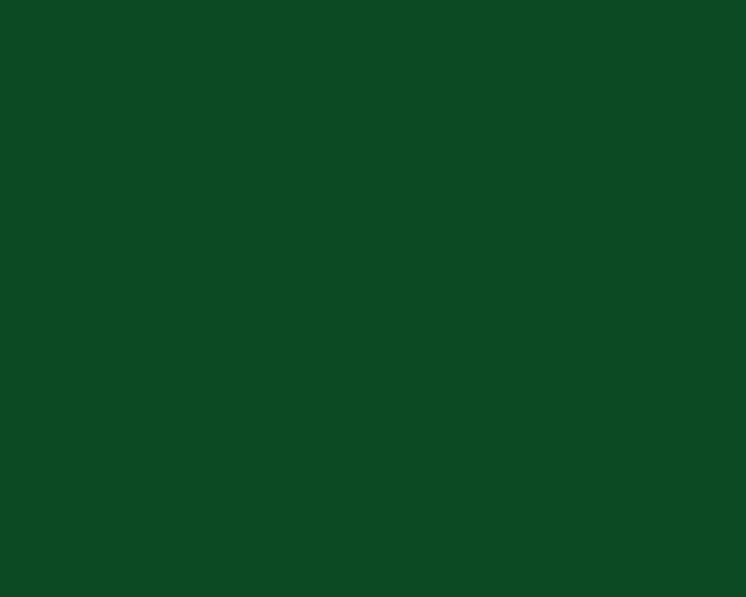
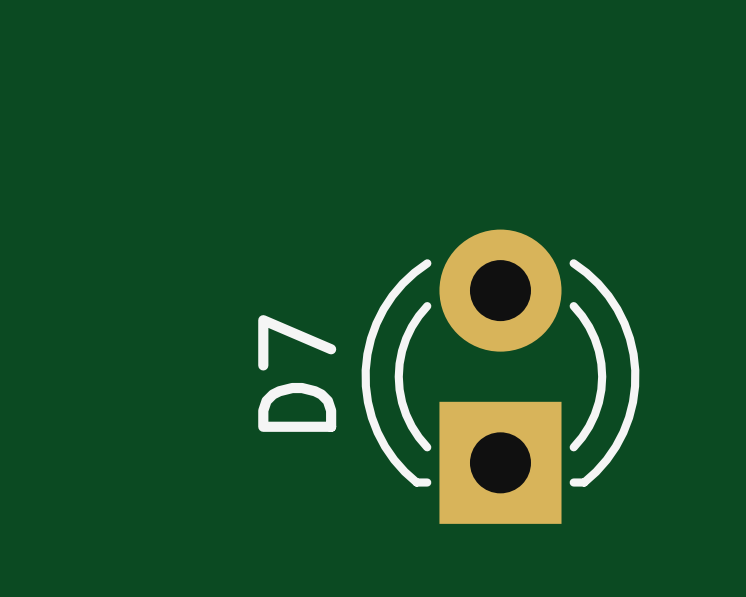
D7: none -> (500, 376)

